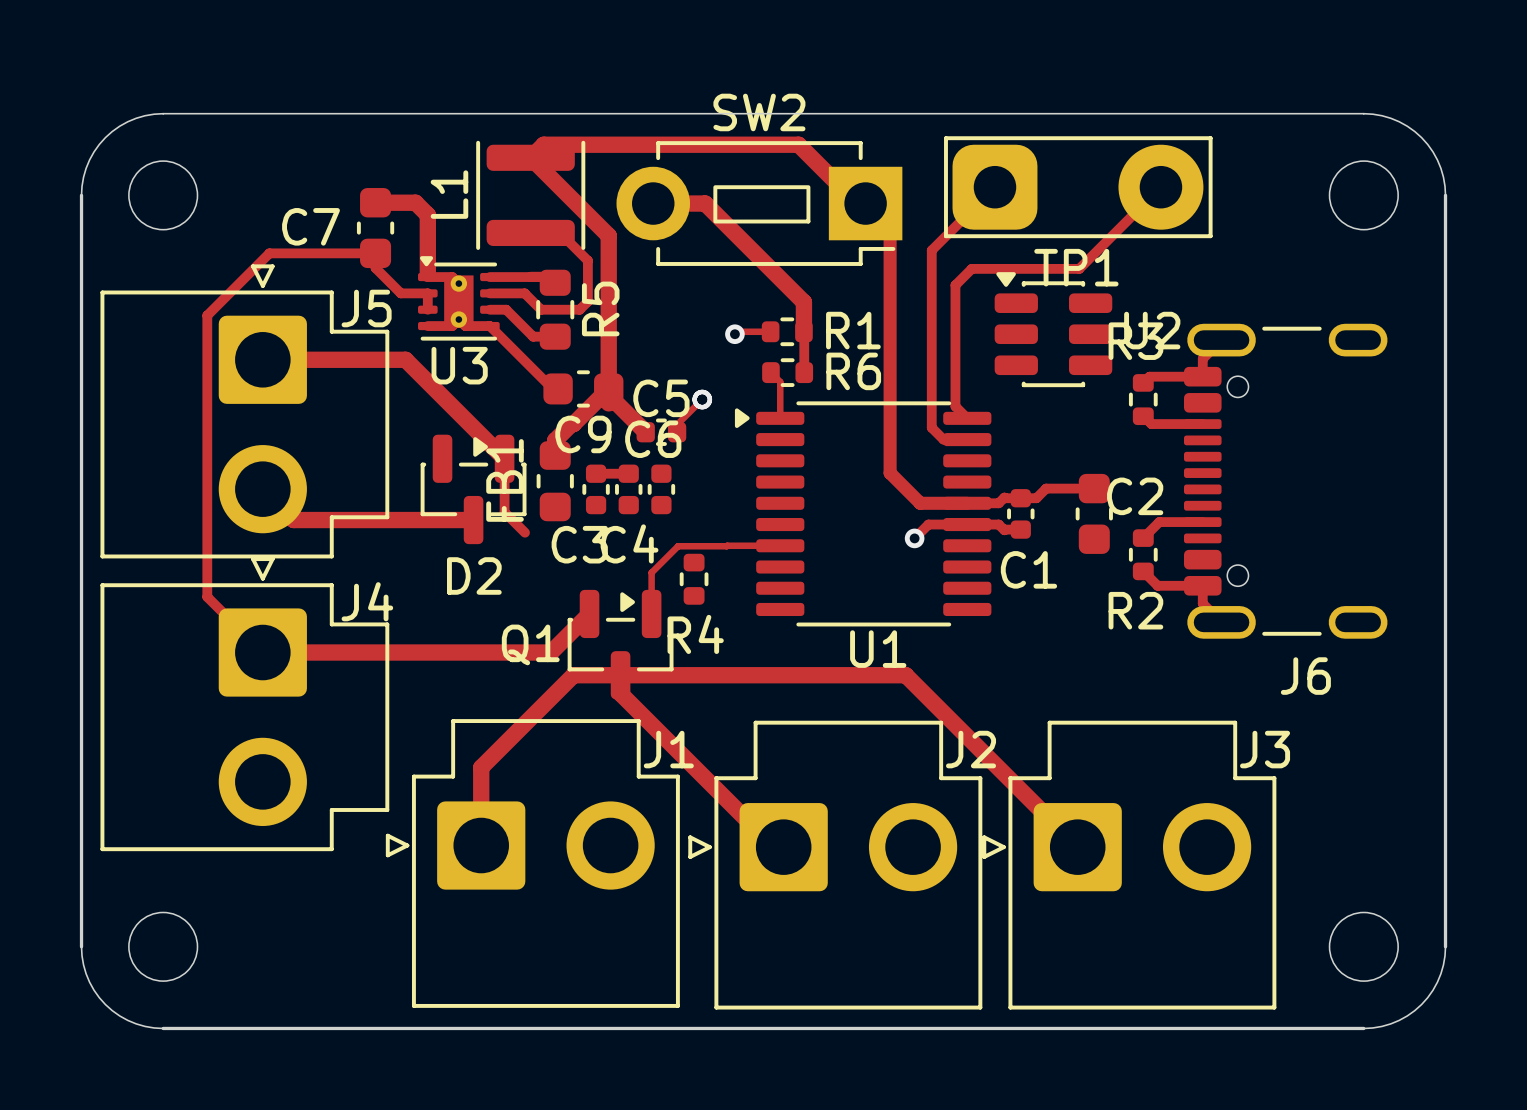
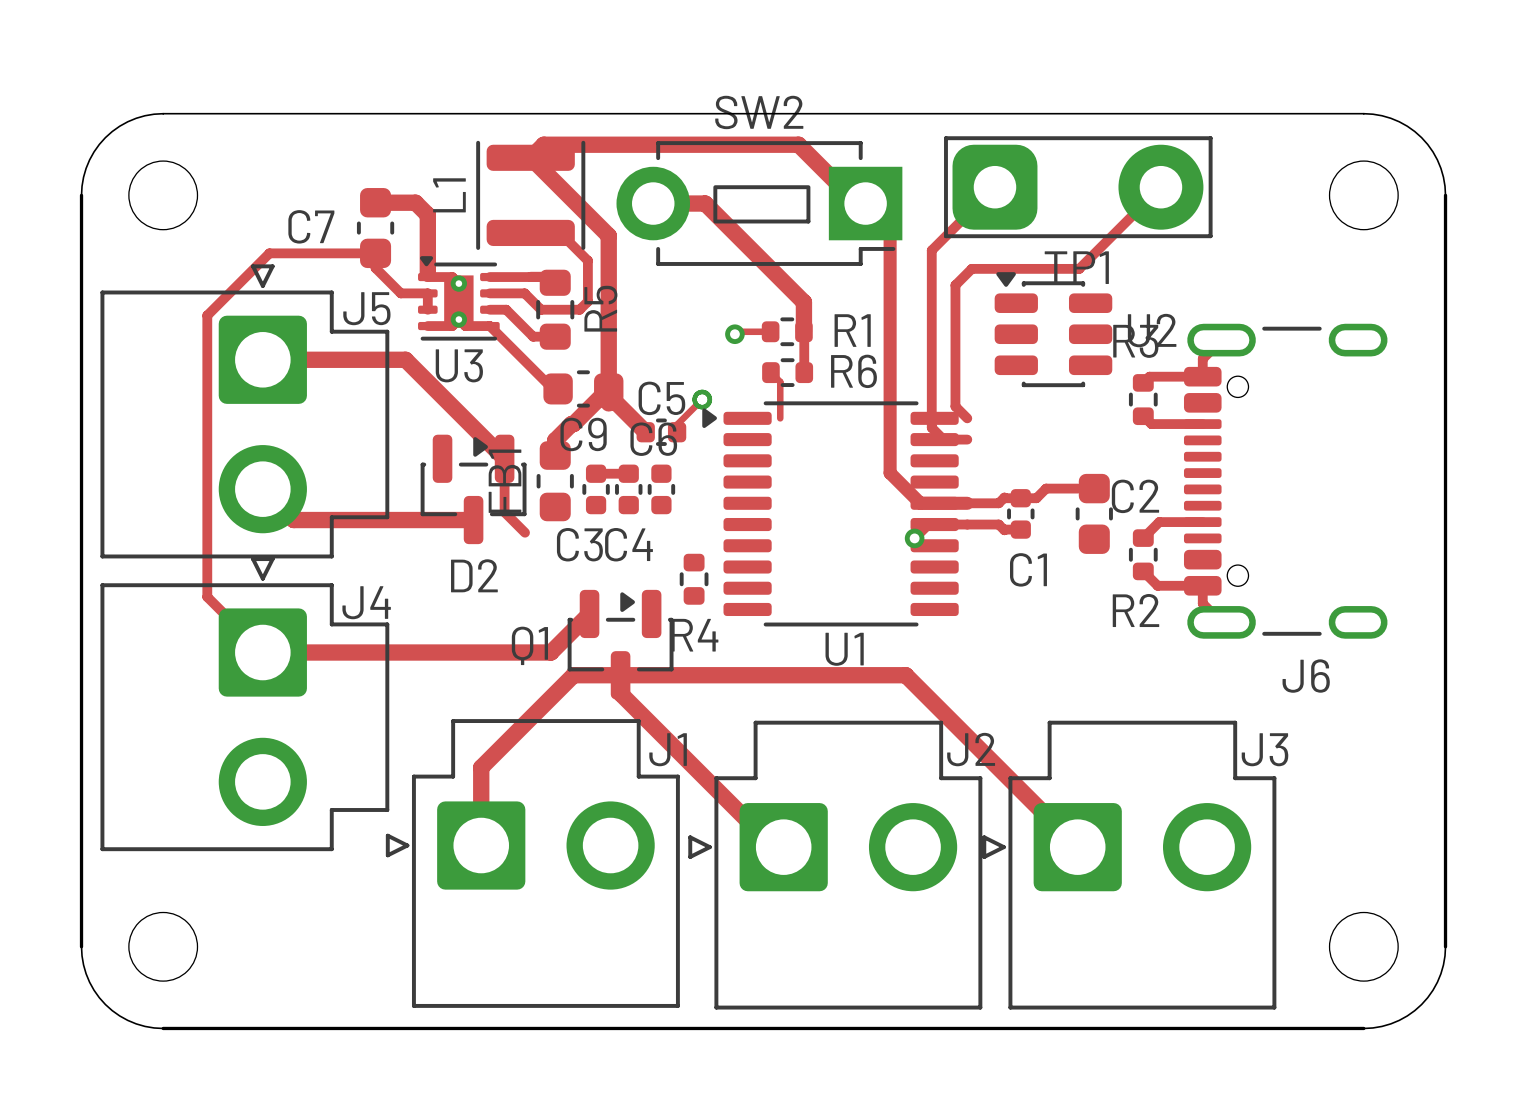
U1 position: (863, 513) -> (830, 513)
track: (780, 545) (678, 546) (651, 572) (651, 613) -> none

